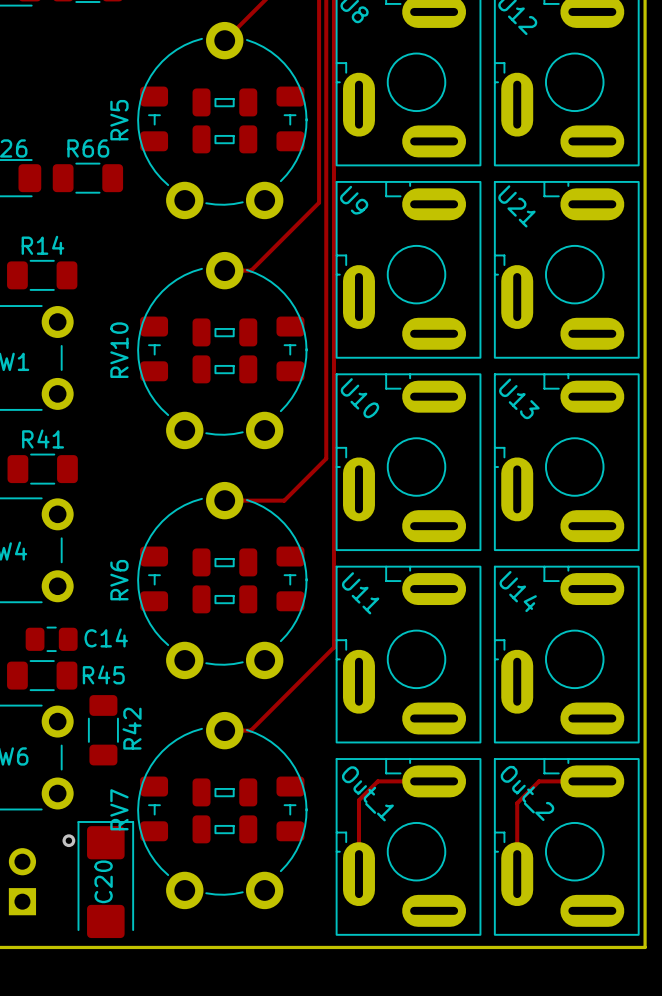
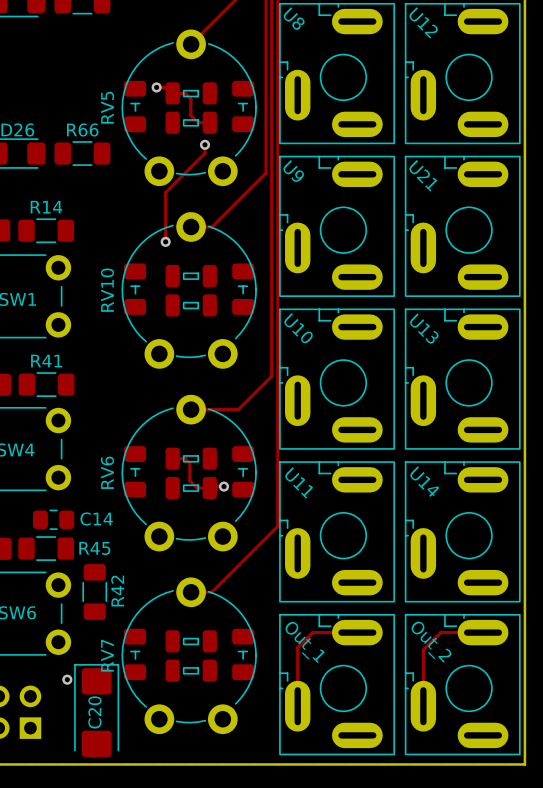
track: none -> (156, 87) (166, 87) (172, 93) (185, 93) (190, 98) (190, 115) (198, 122) (209, 122)
via: none -> (156, 87)
track: none -> (204, 144) (204, 153) (165, 192) (165, 241)
via: none -> (204, 144)
via: none -> (165, 241)
track: none -> (172, 458) (185, 458) (189, 463) (189, 480) (197, 488) (224, 486)
via: none -> (224, 486)

